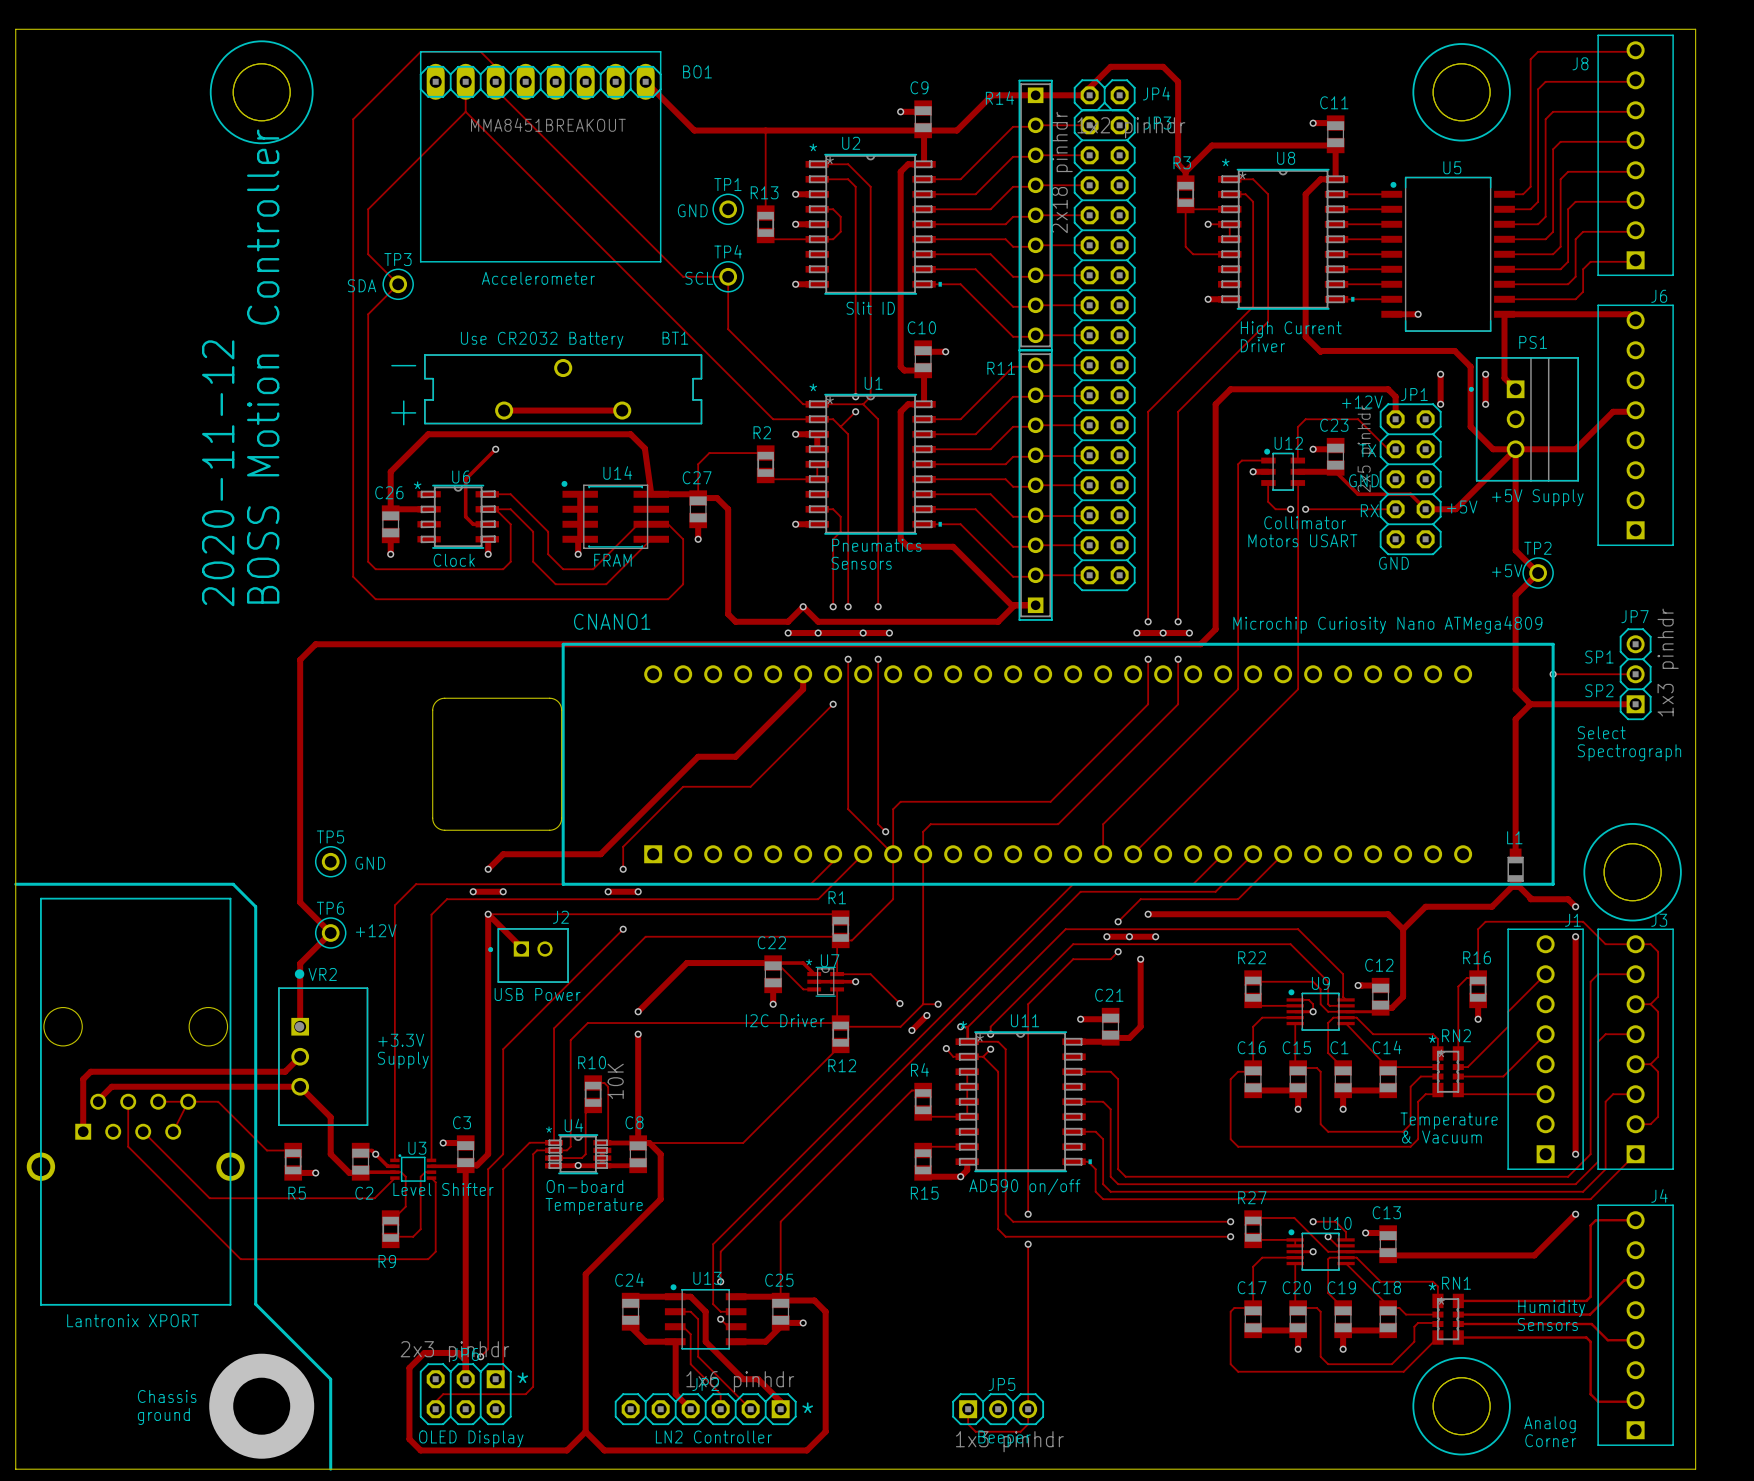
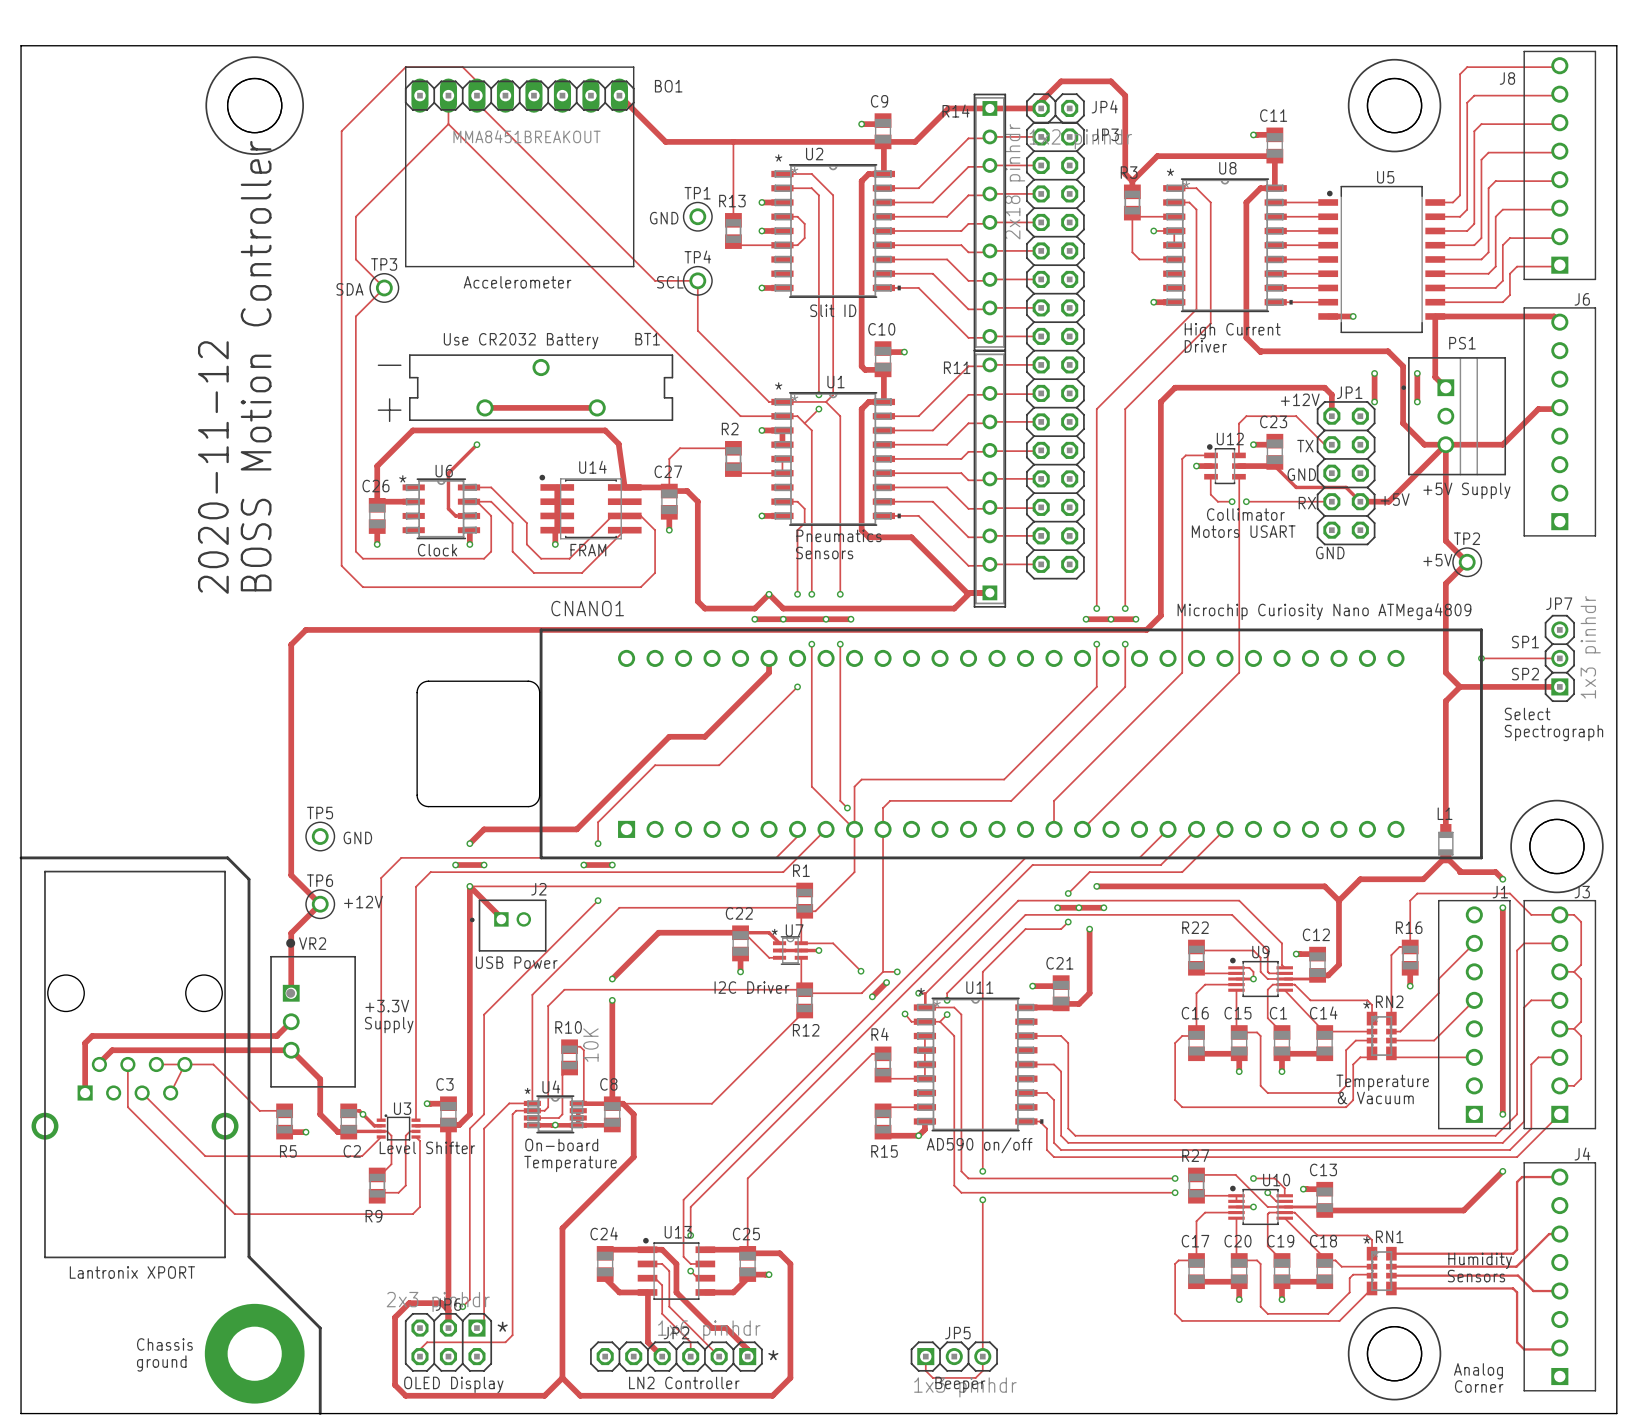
JP1 value: 2x5 pinhdr (1366, 448) -> none

